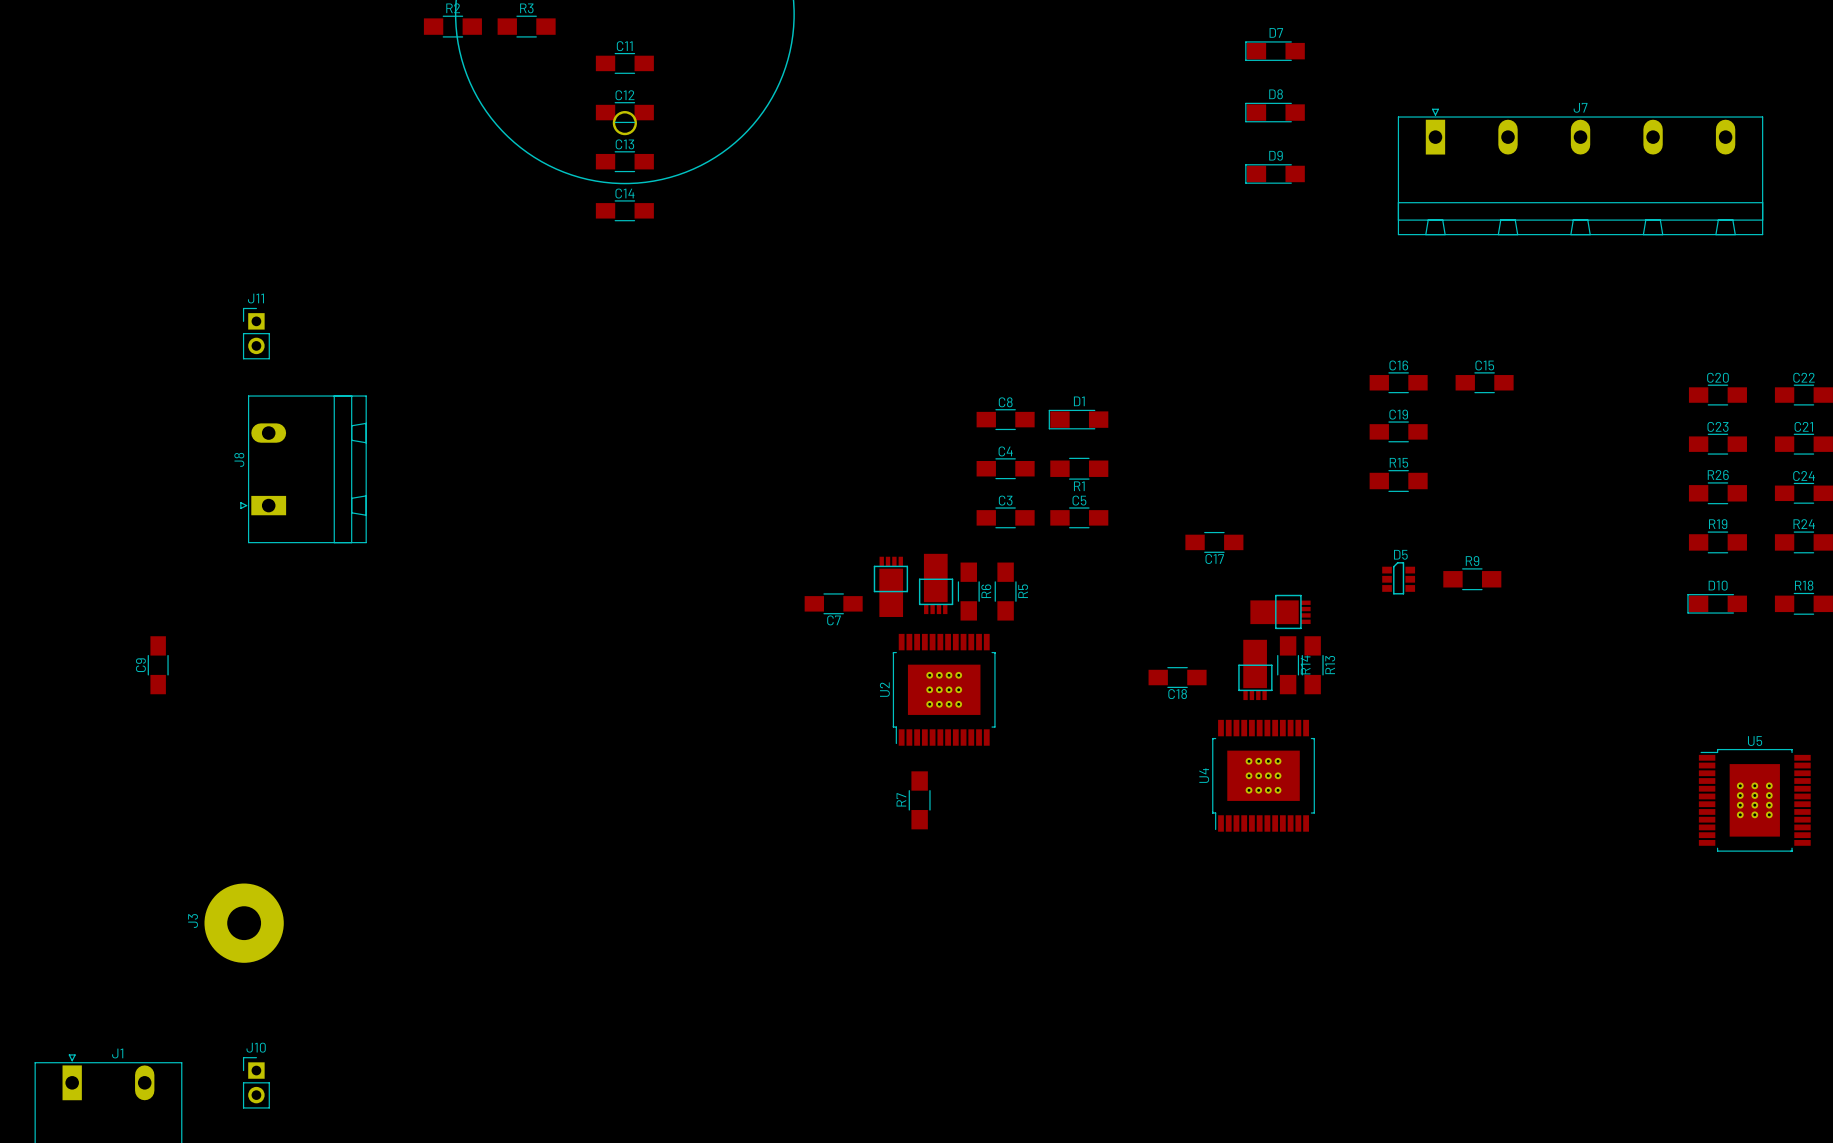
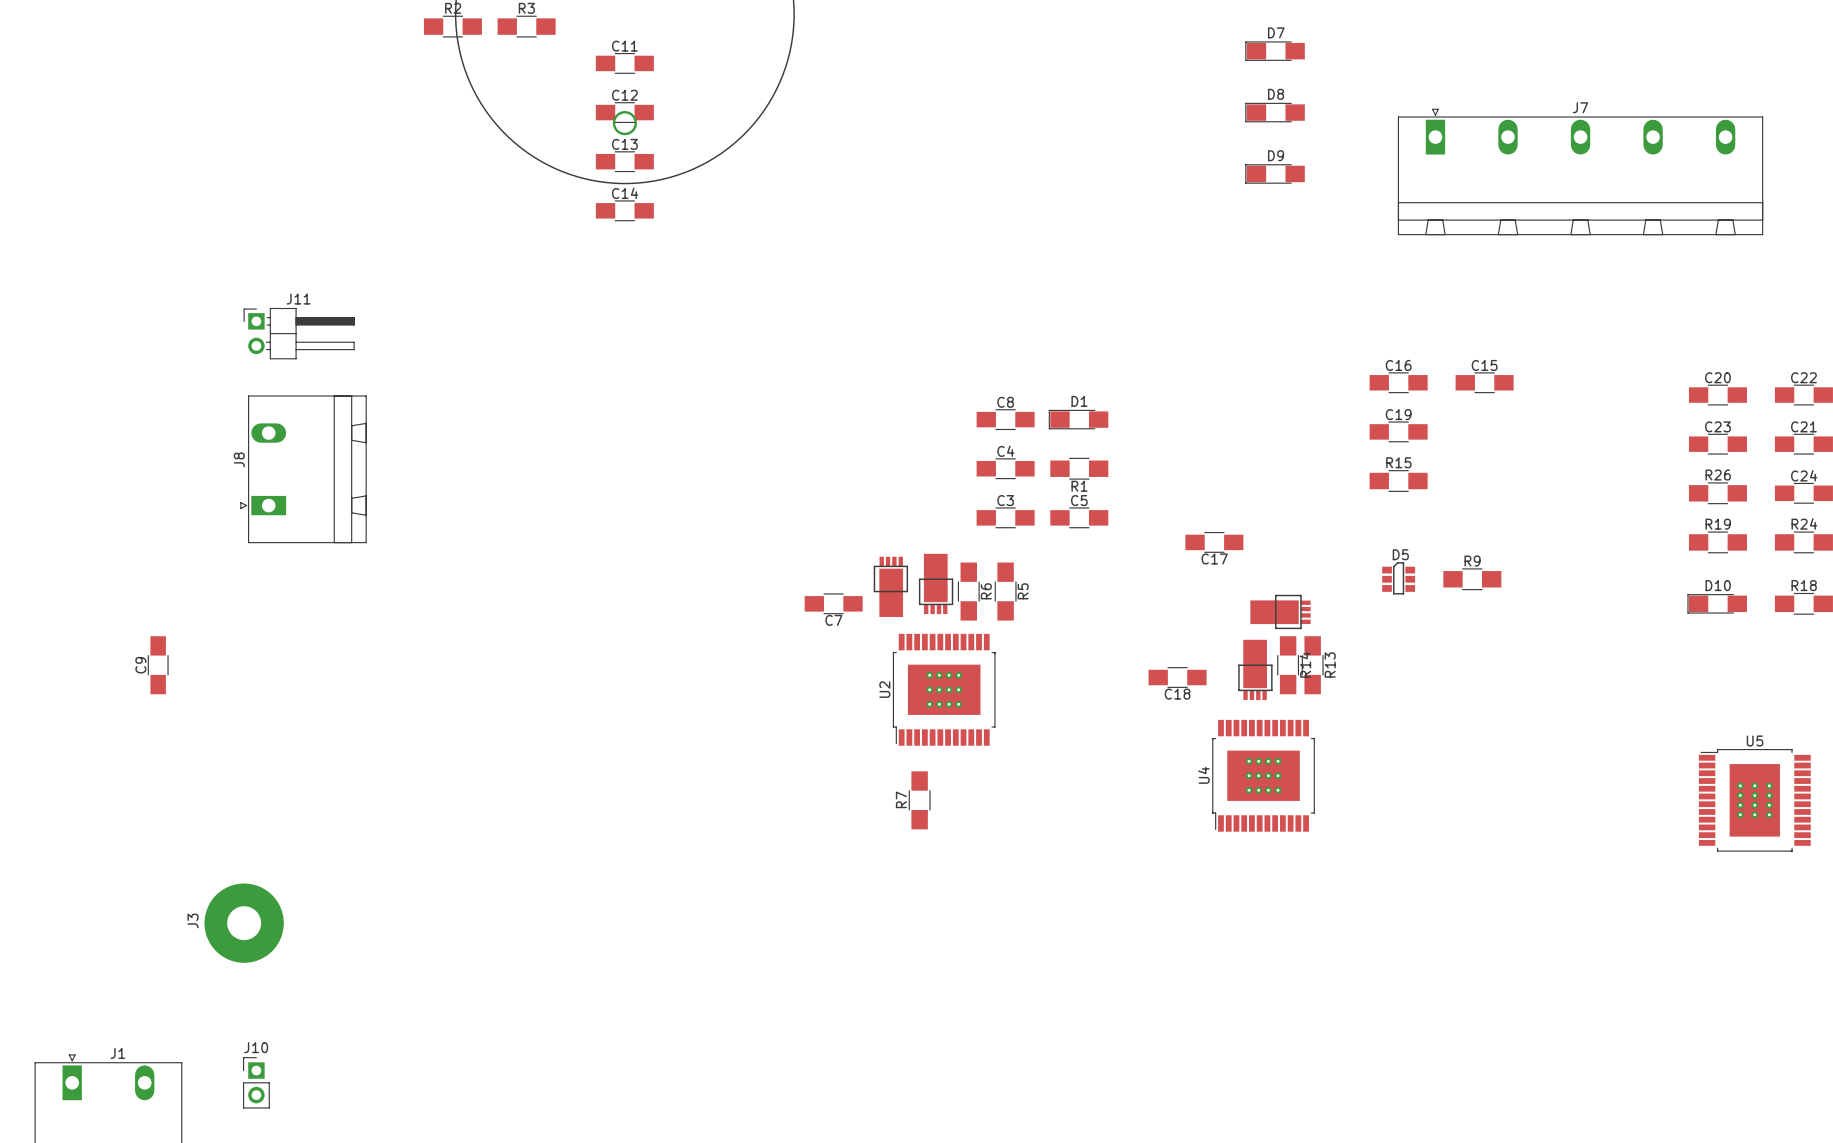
J11 footprint: [242, 307, 270, 360] -> [243, 307, 355, 360]

